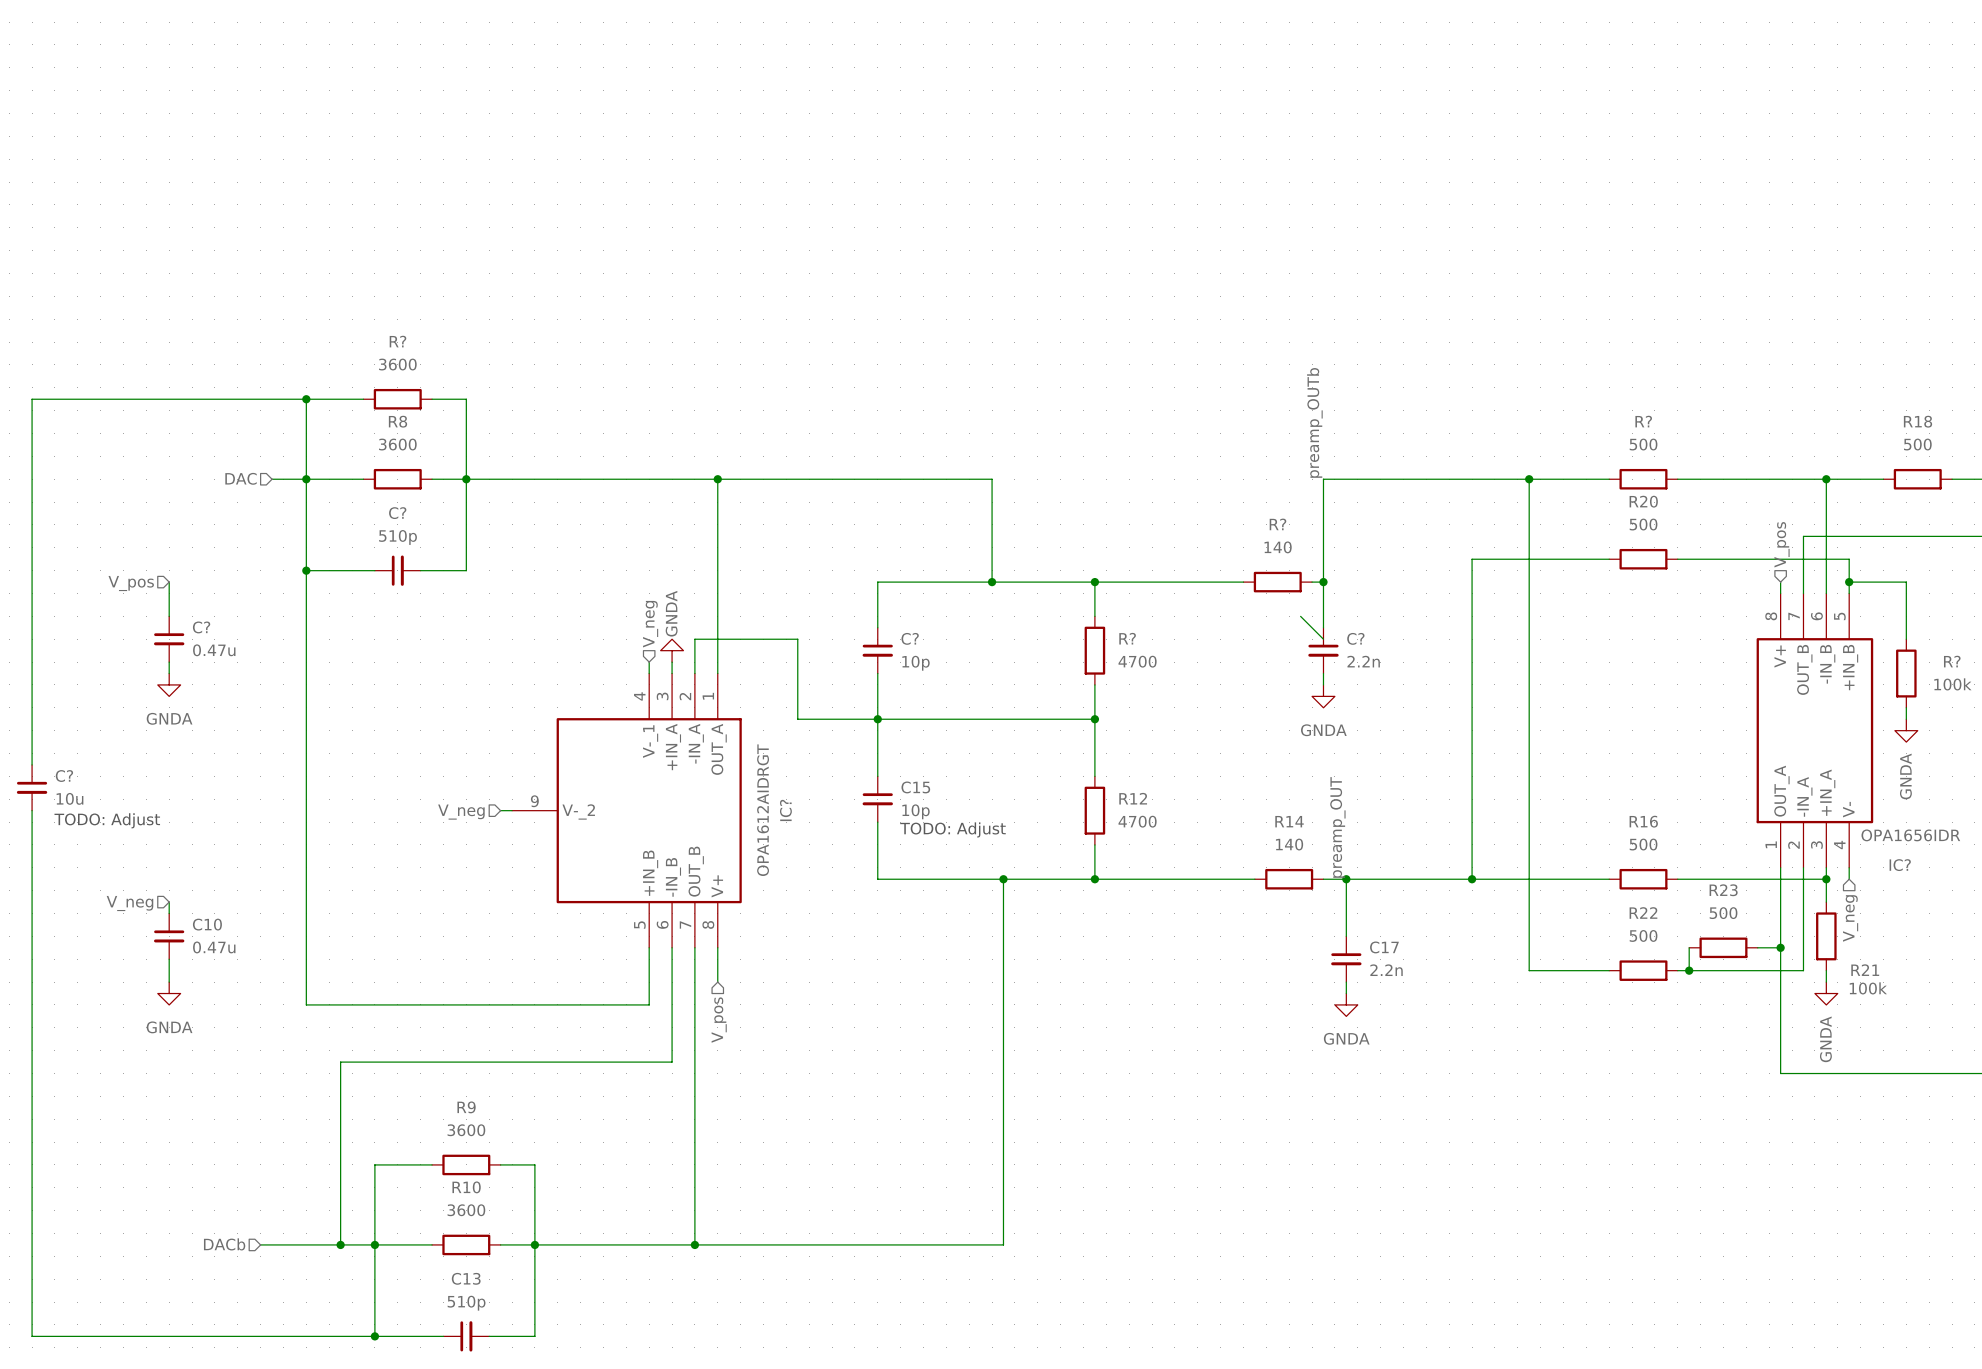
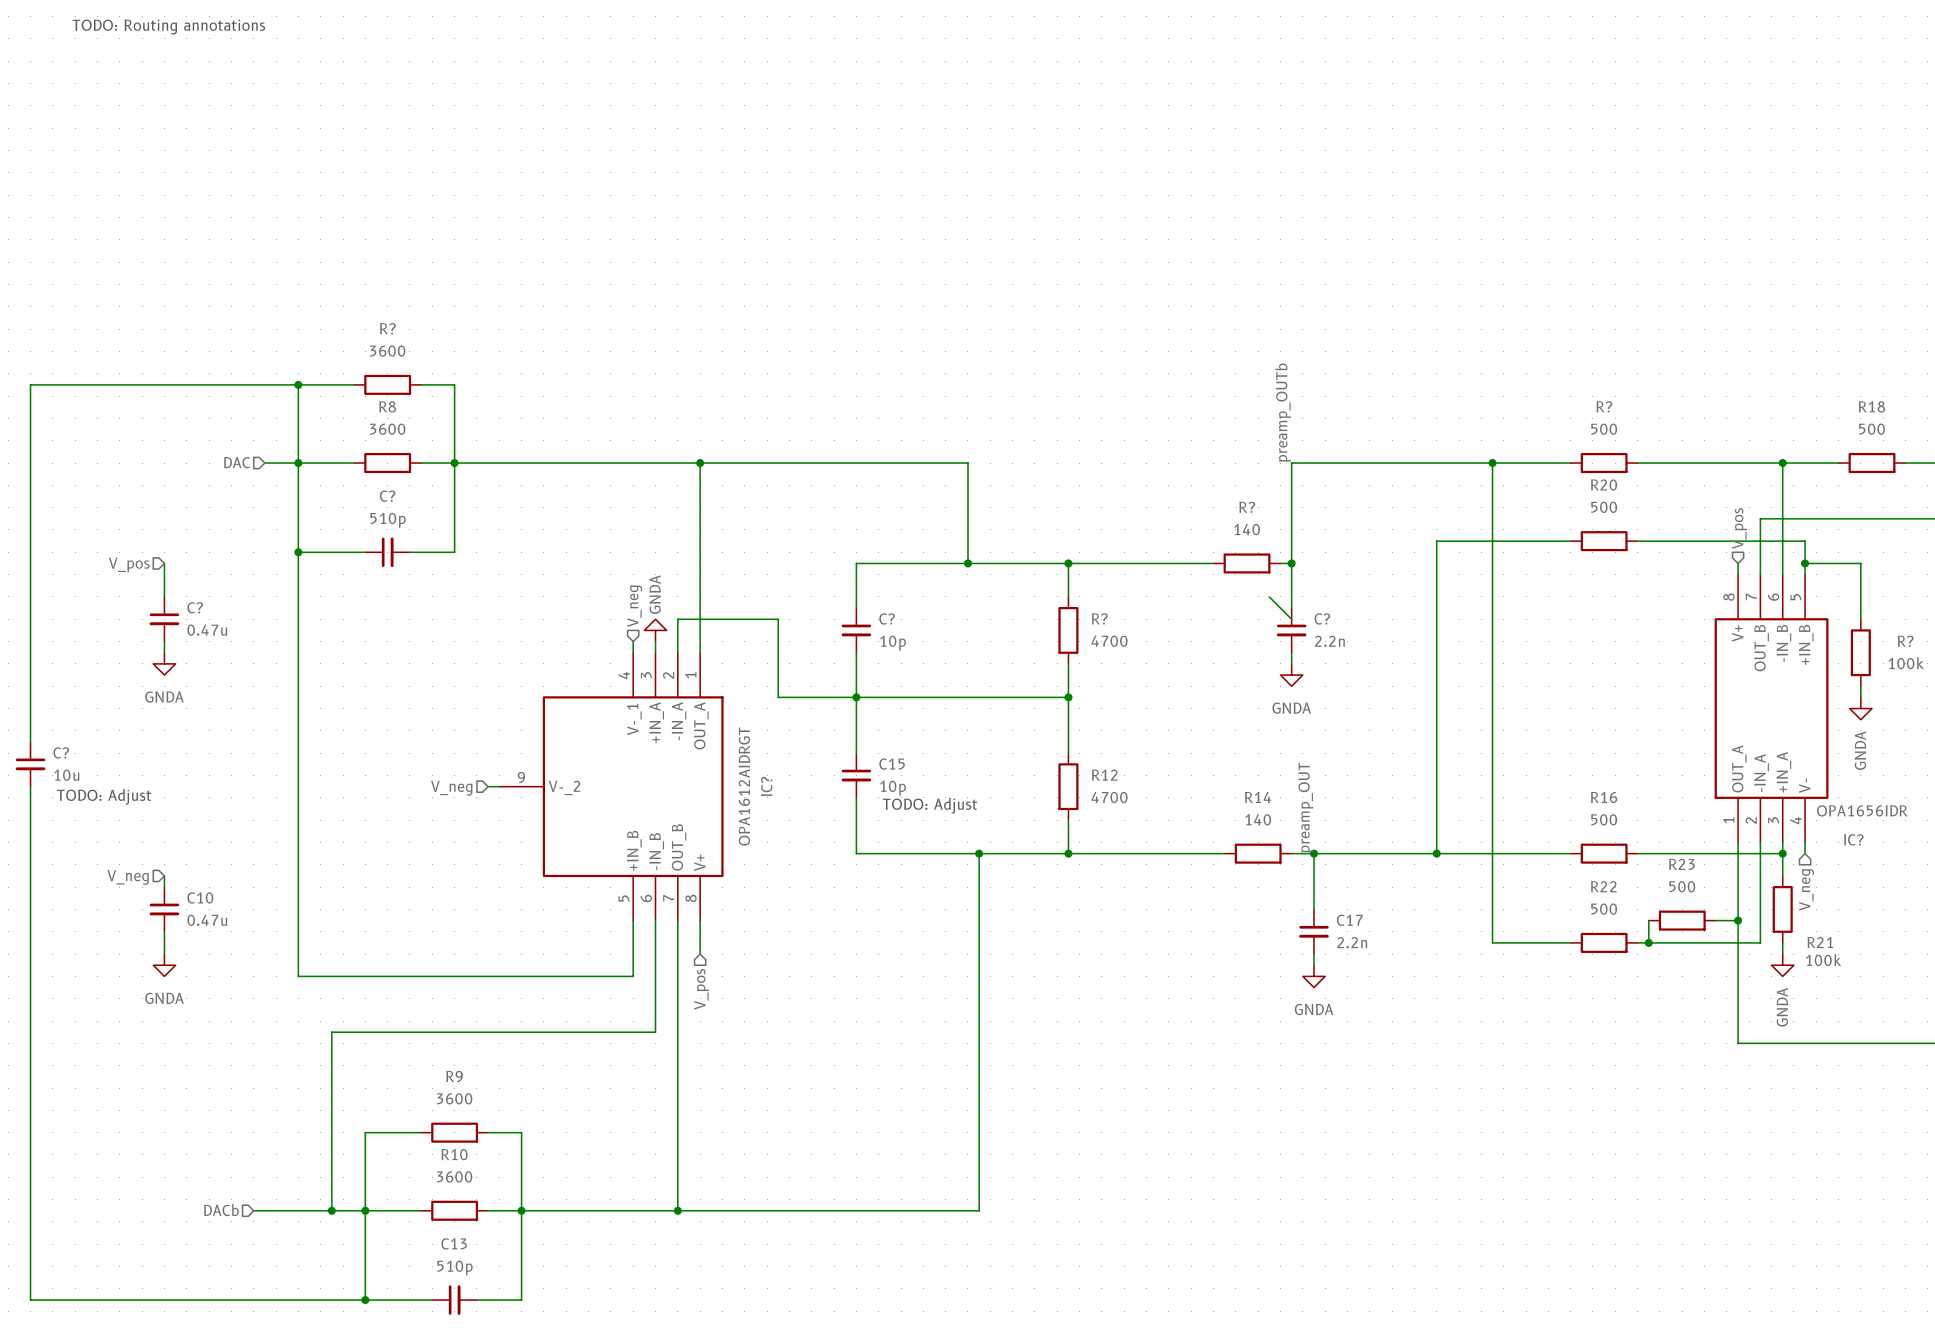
text: none -> TODO: Routing annotations (168, 27)

